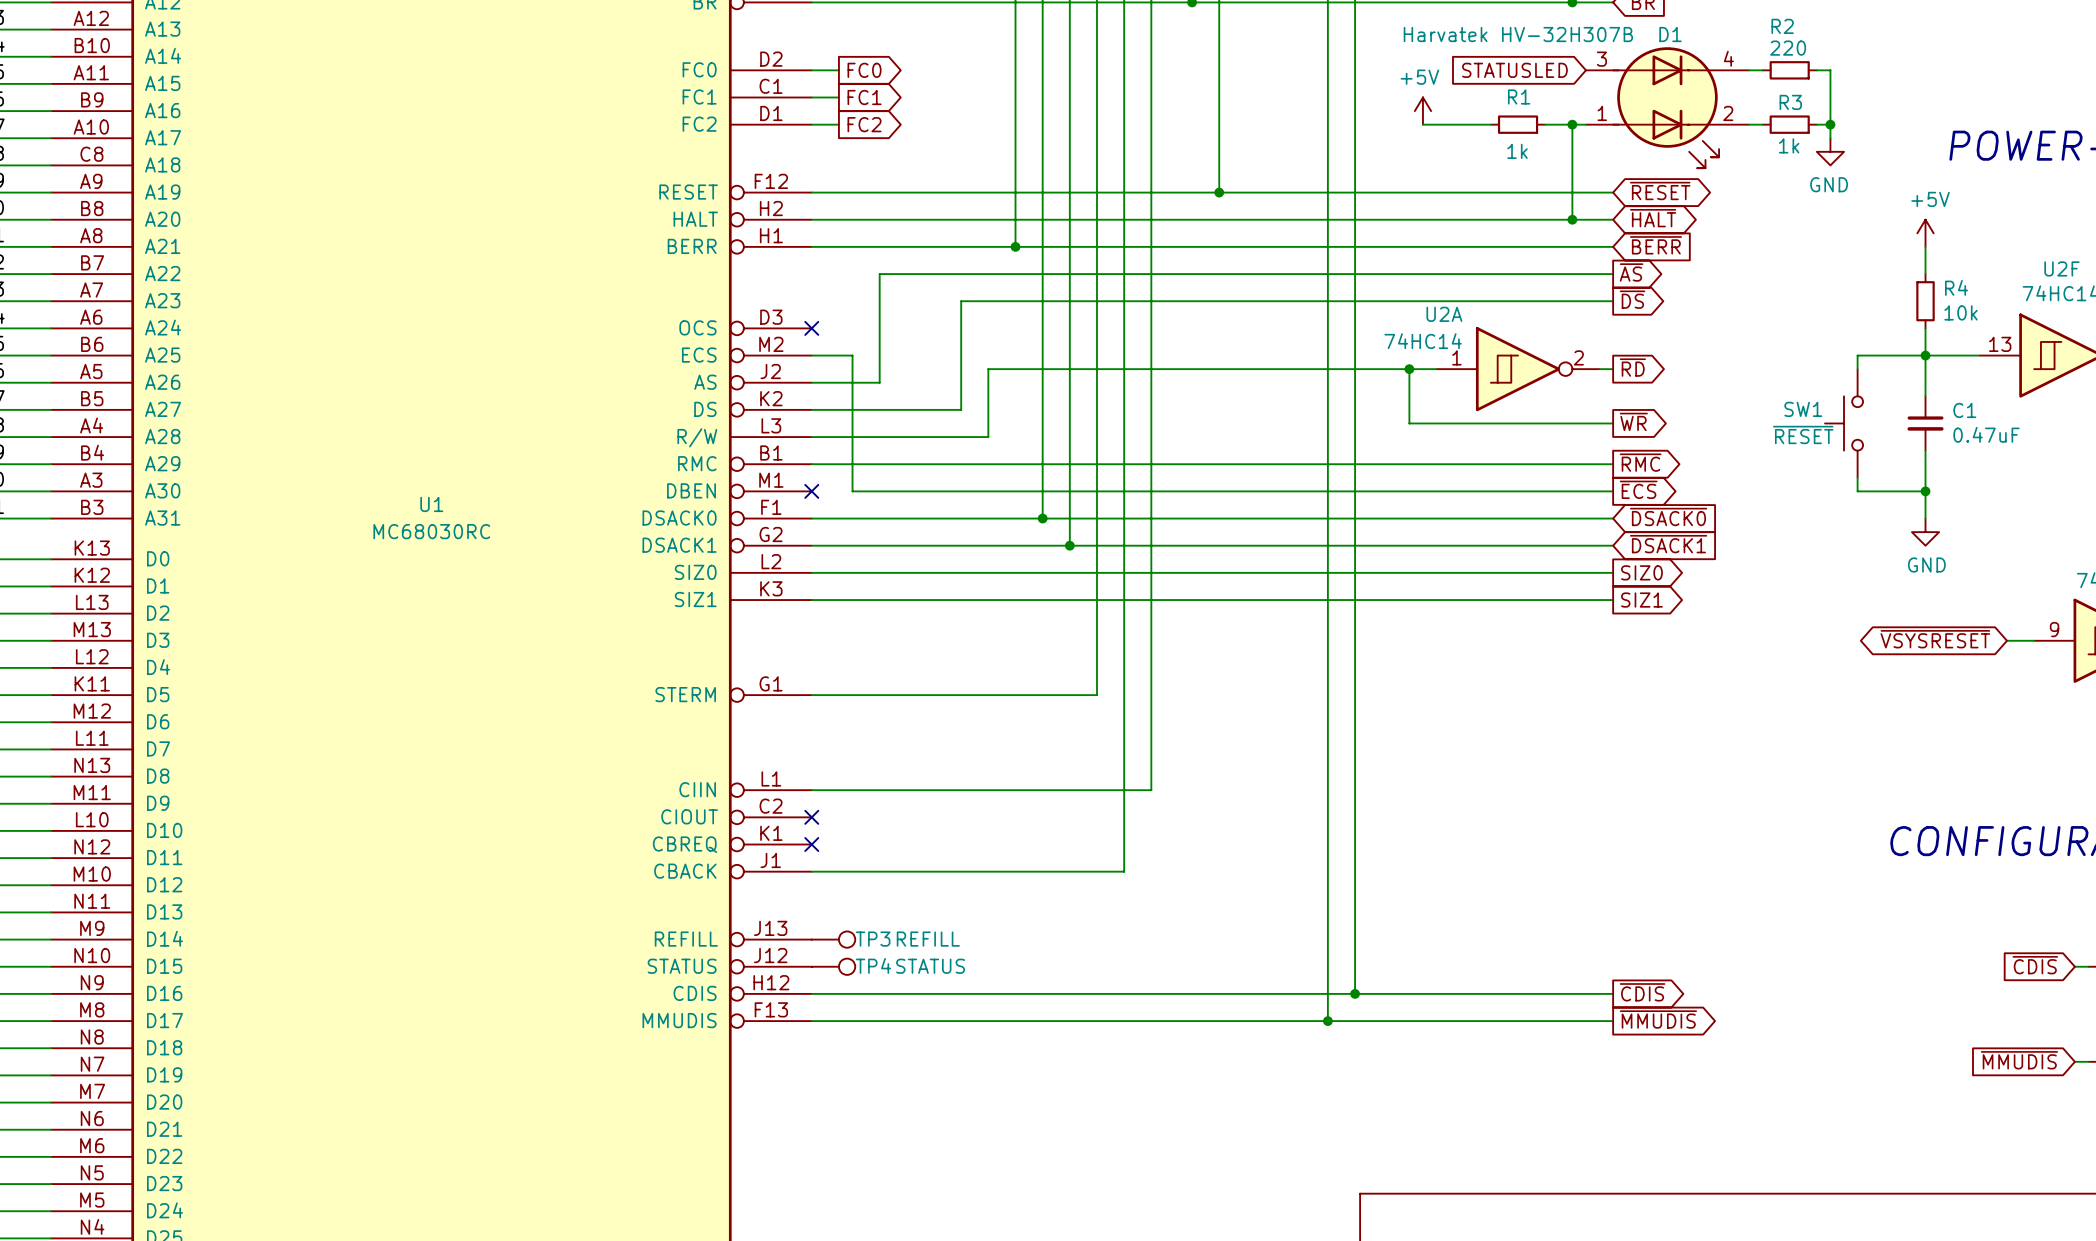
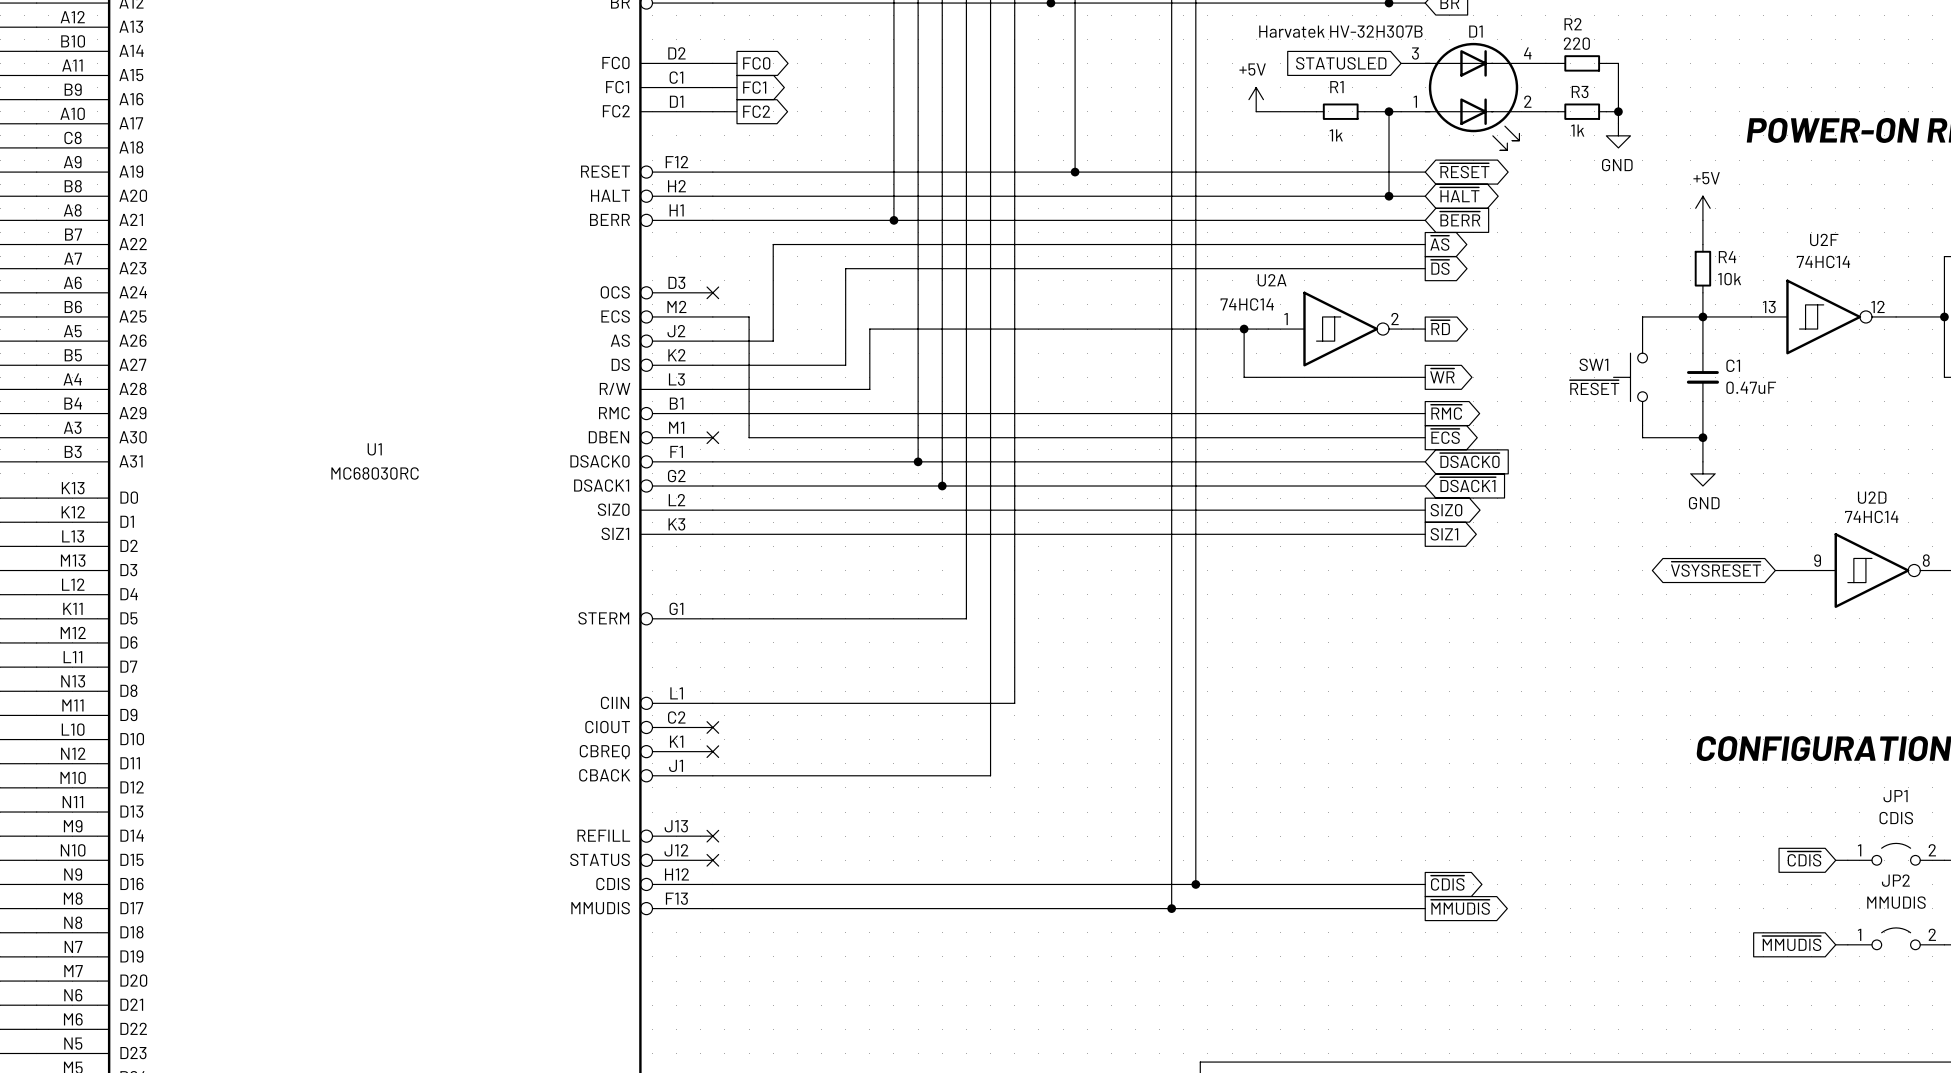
no-connect mark: none -> (712, 836)
TP3: REFILL (833, 939) -> none
no-connect mark: none -> (712, 860)
TP4: STATUS (833, 966) -> none

